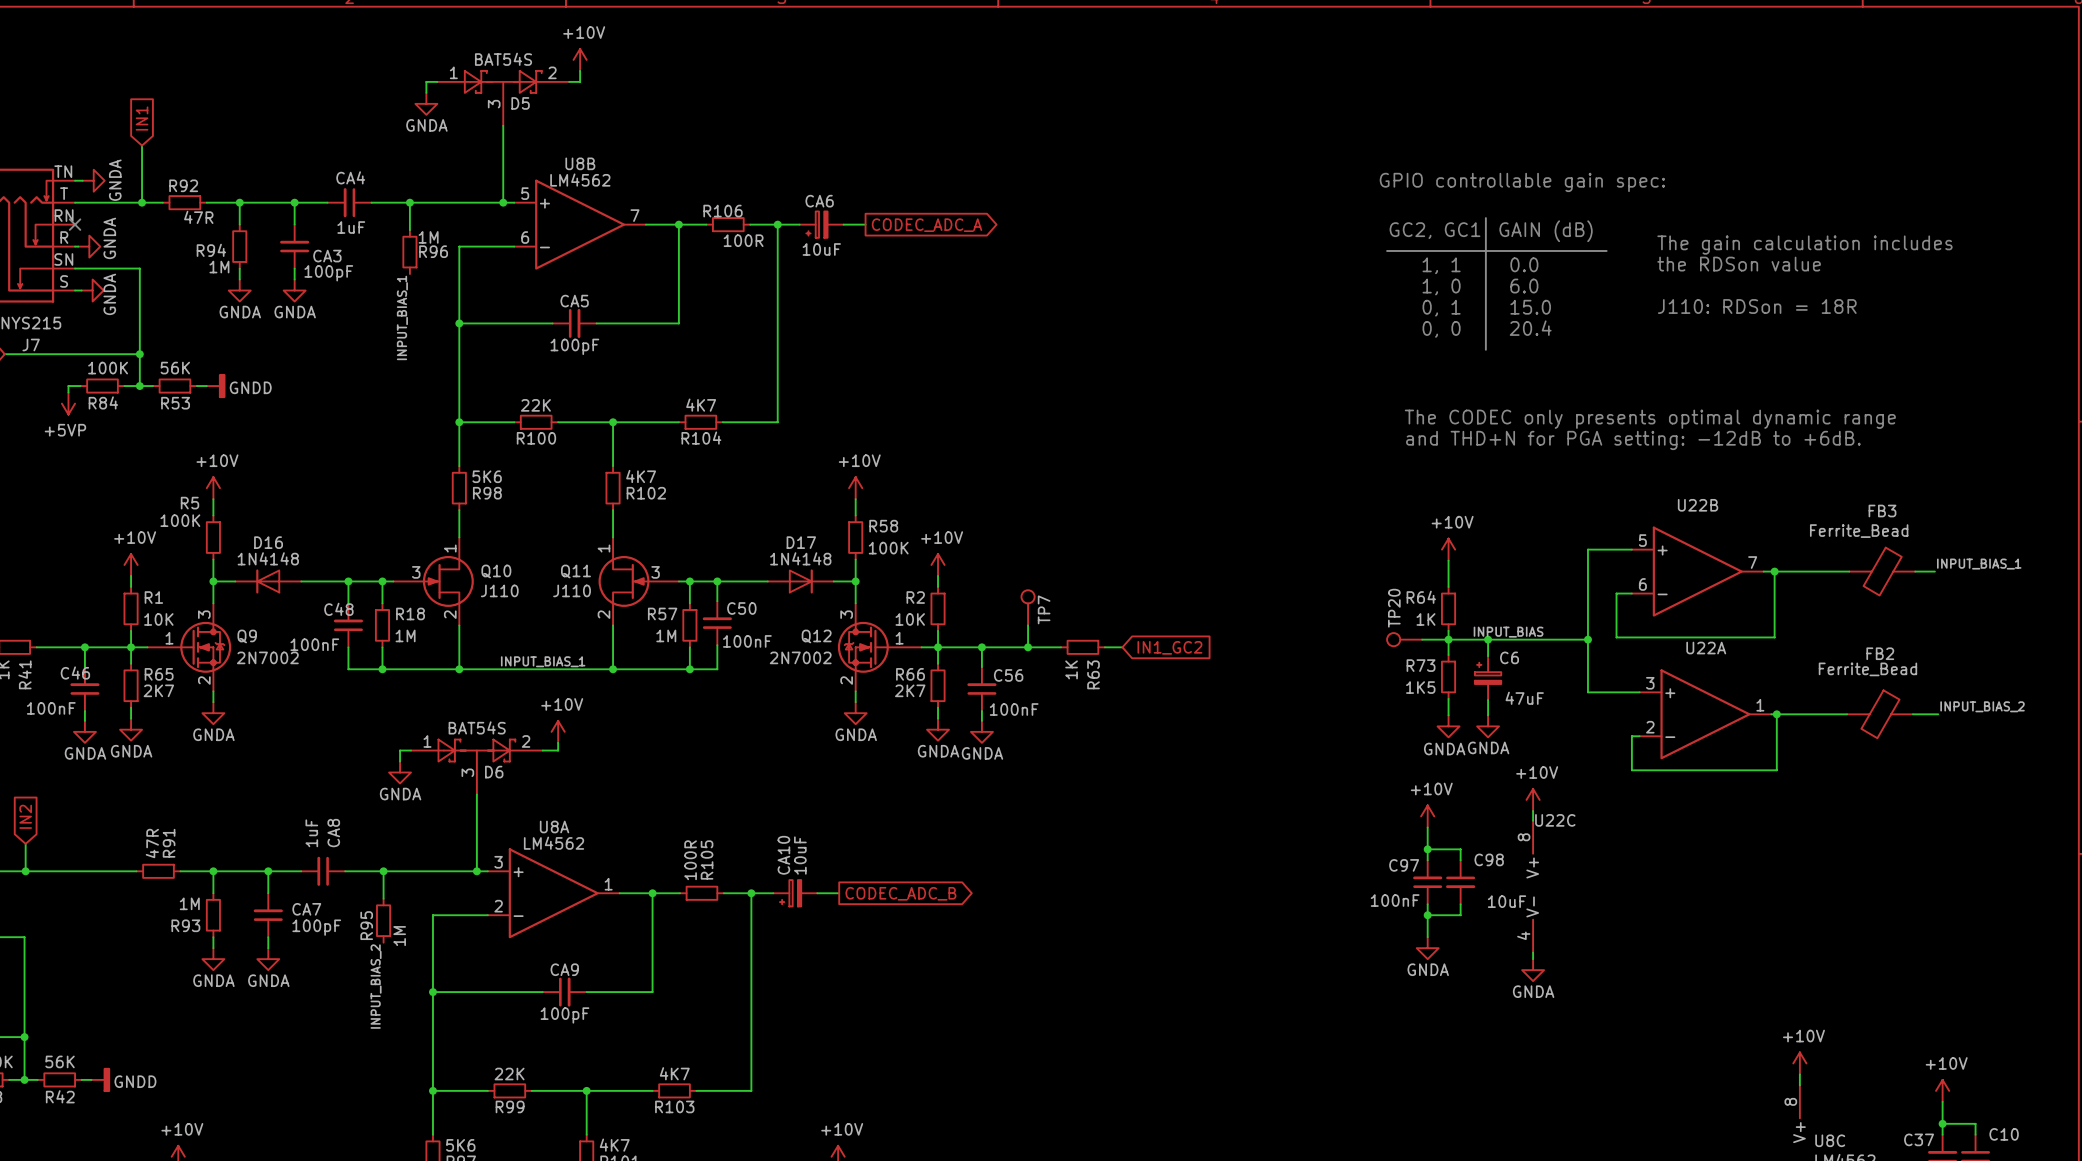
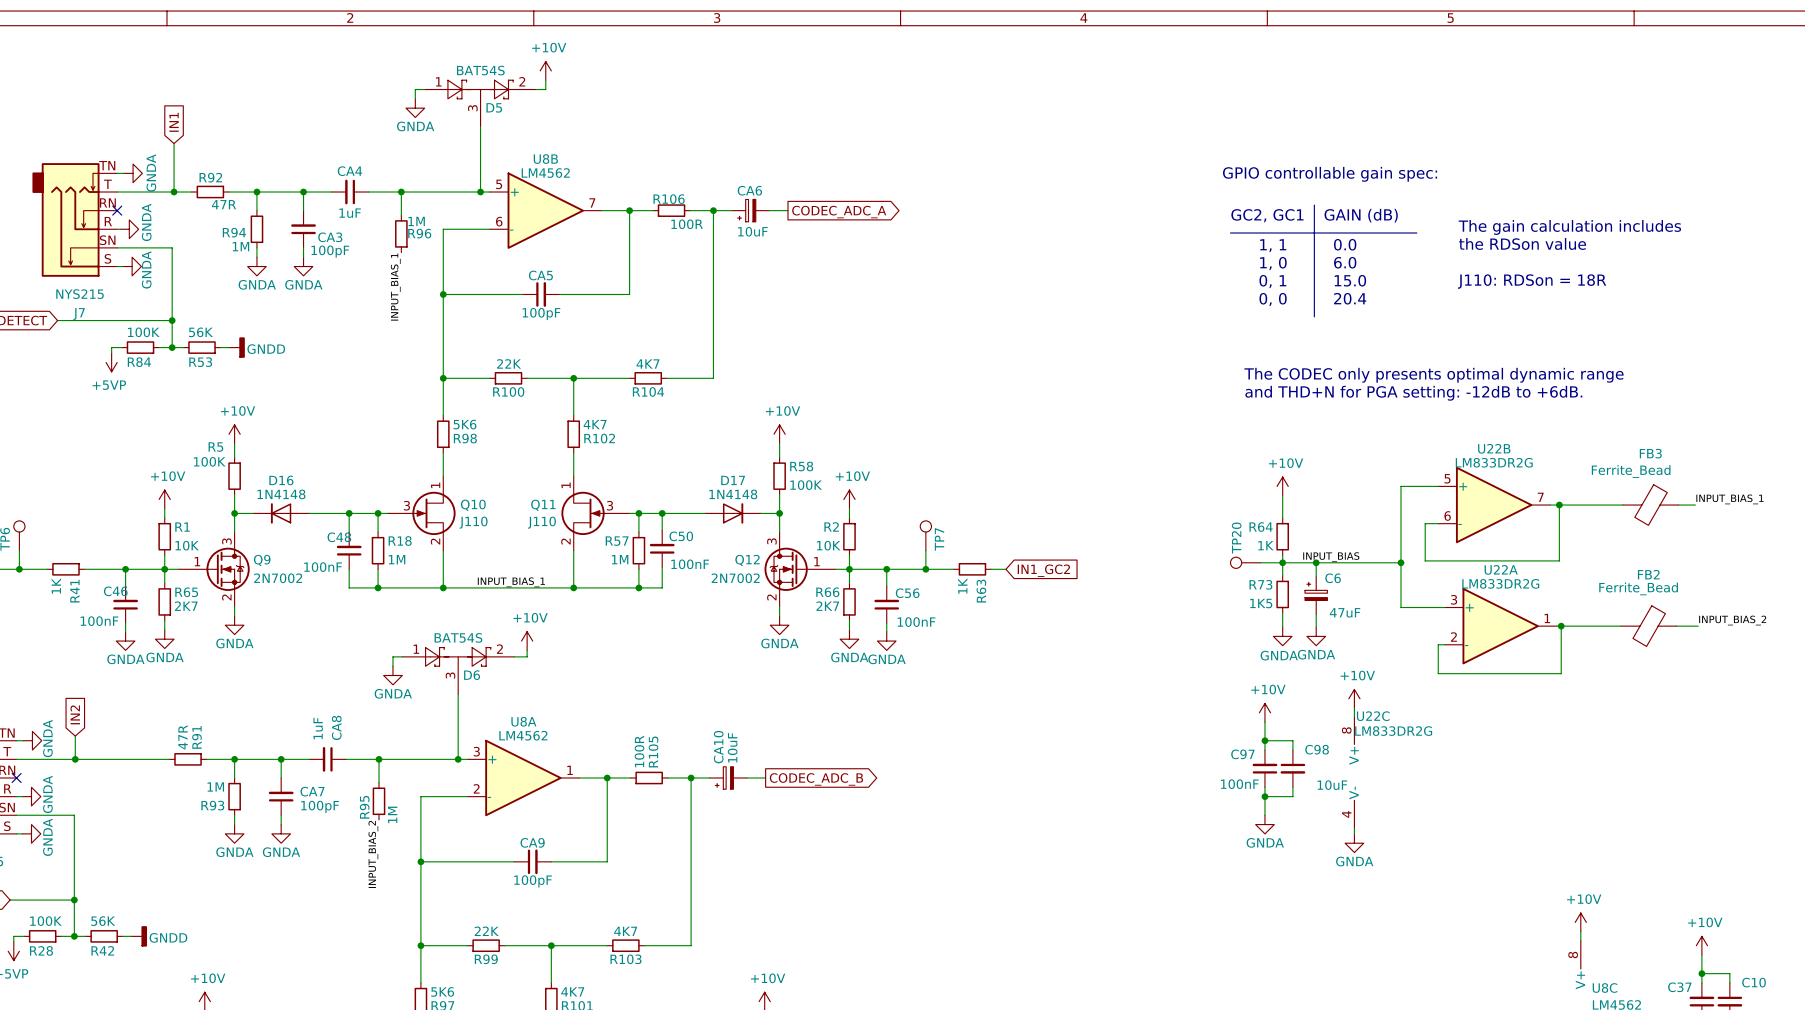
U22B value: none -> LM833DR2G (1494, 462)
U22A value: none -> LM833DR2G (1500, 583)
U22C value: none -> LM833DR2G (1393, 731)

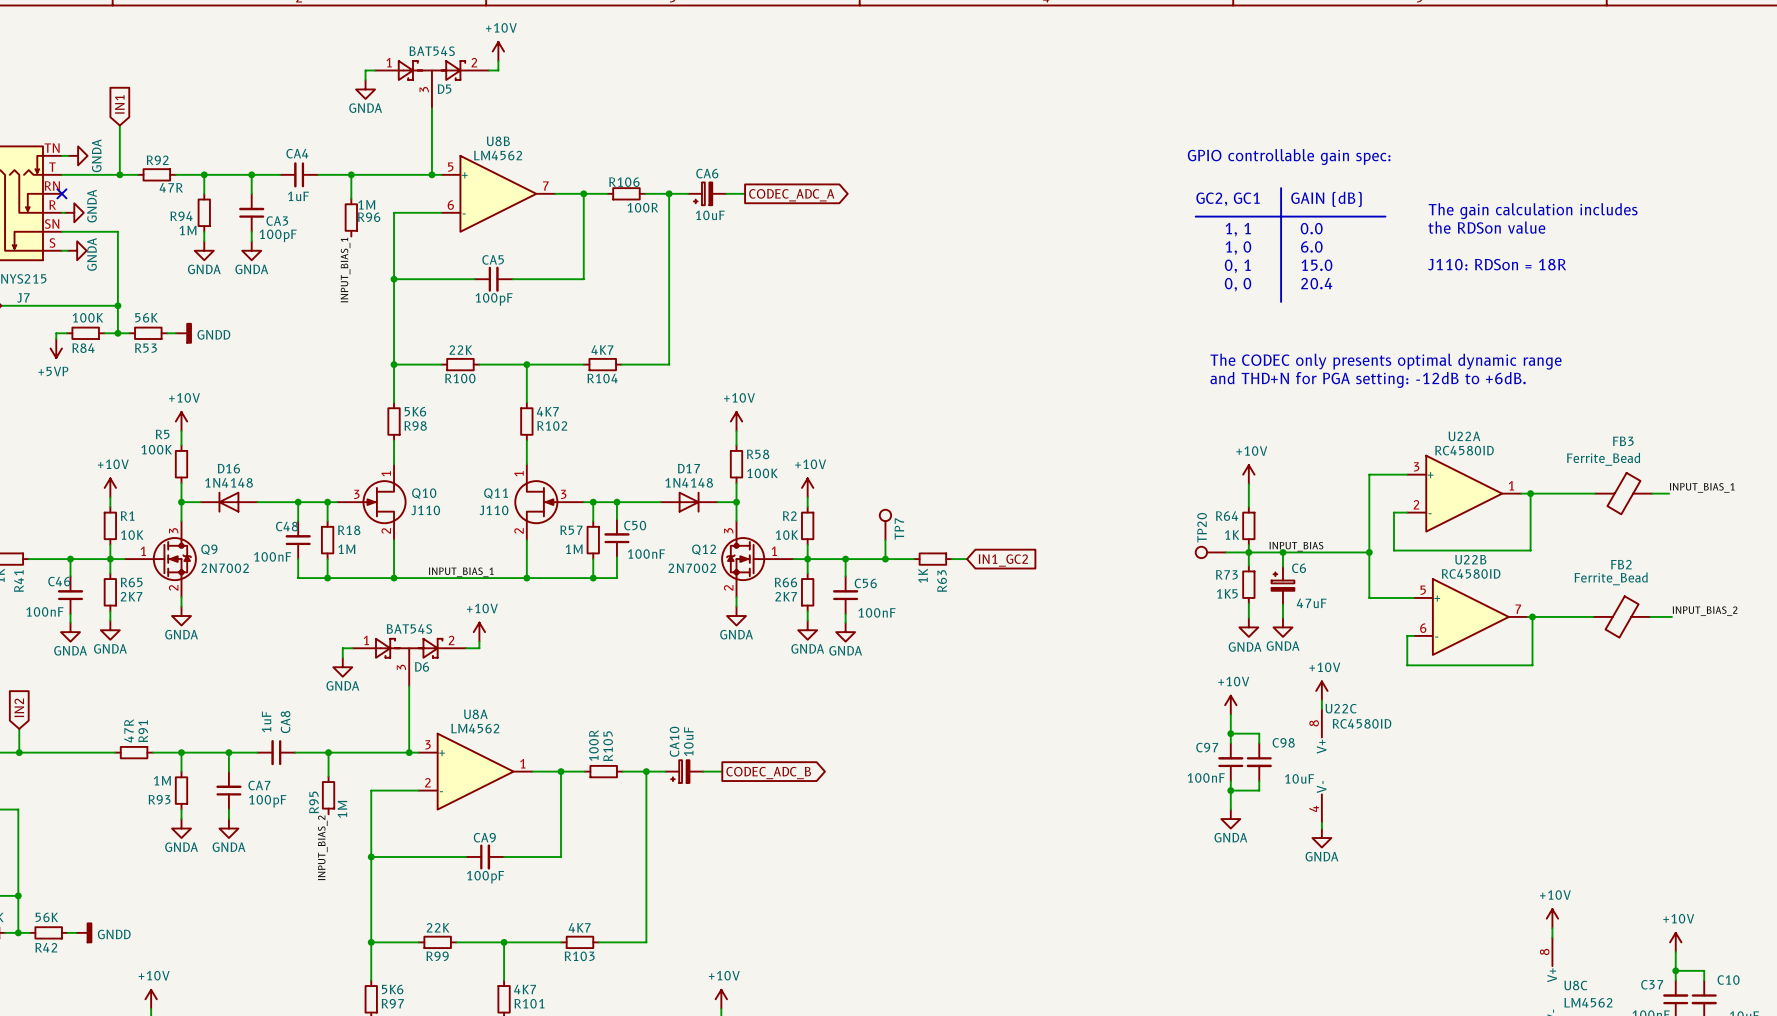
U22B value: LM833DR2G (1494, 462) -> RC4580ID (1471, 573)
U22B position: (1494, 505) -> (1470, 616)
U22A value: LM833DR2G (1500, 583) -> RC4580ID (1464, 450)
U22A position: (1500, 626) -> (1464, 493)
U22C value: LM833DR2G (1393, 731) -> RC4580ID (1362, 723)

